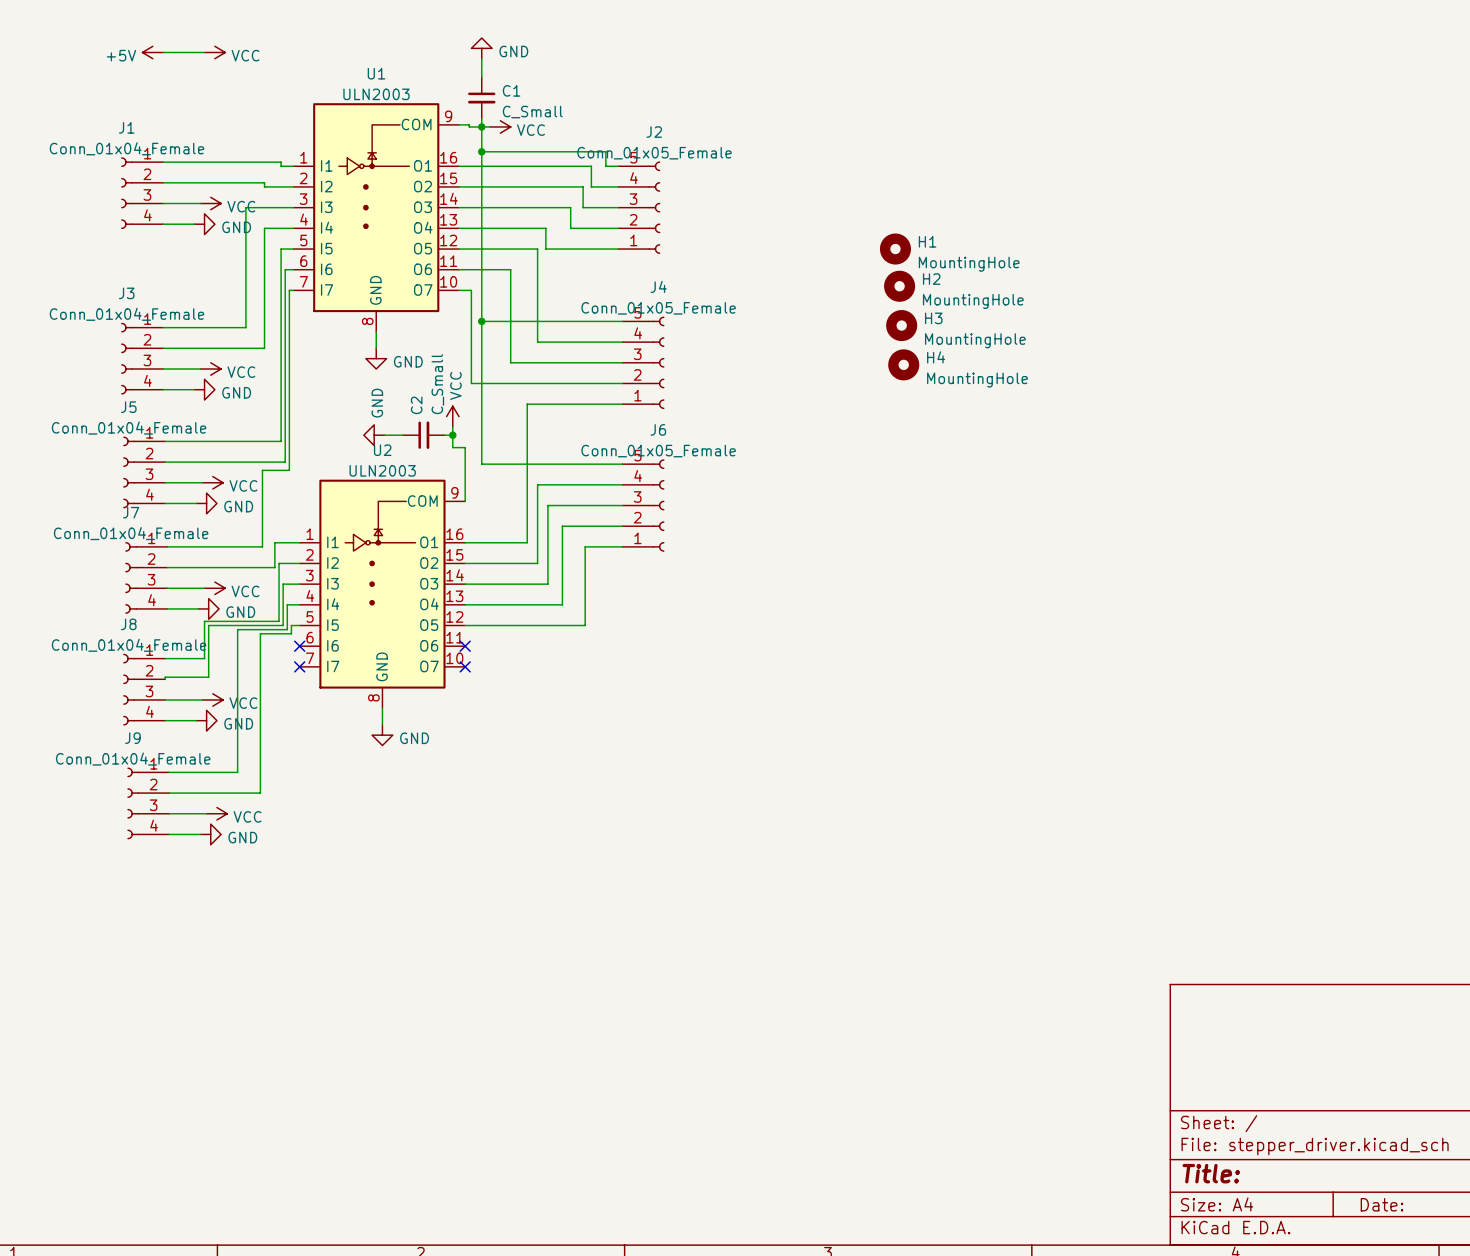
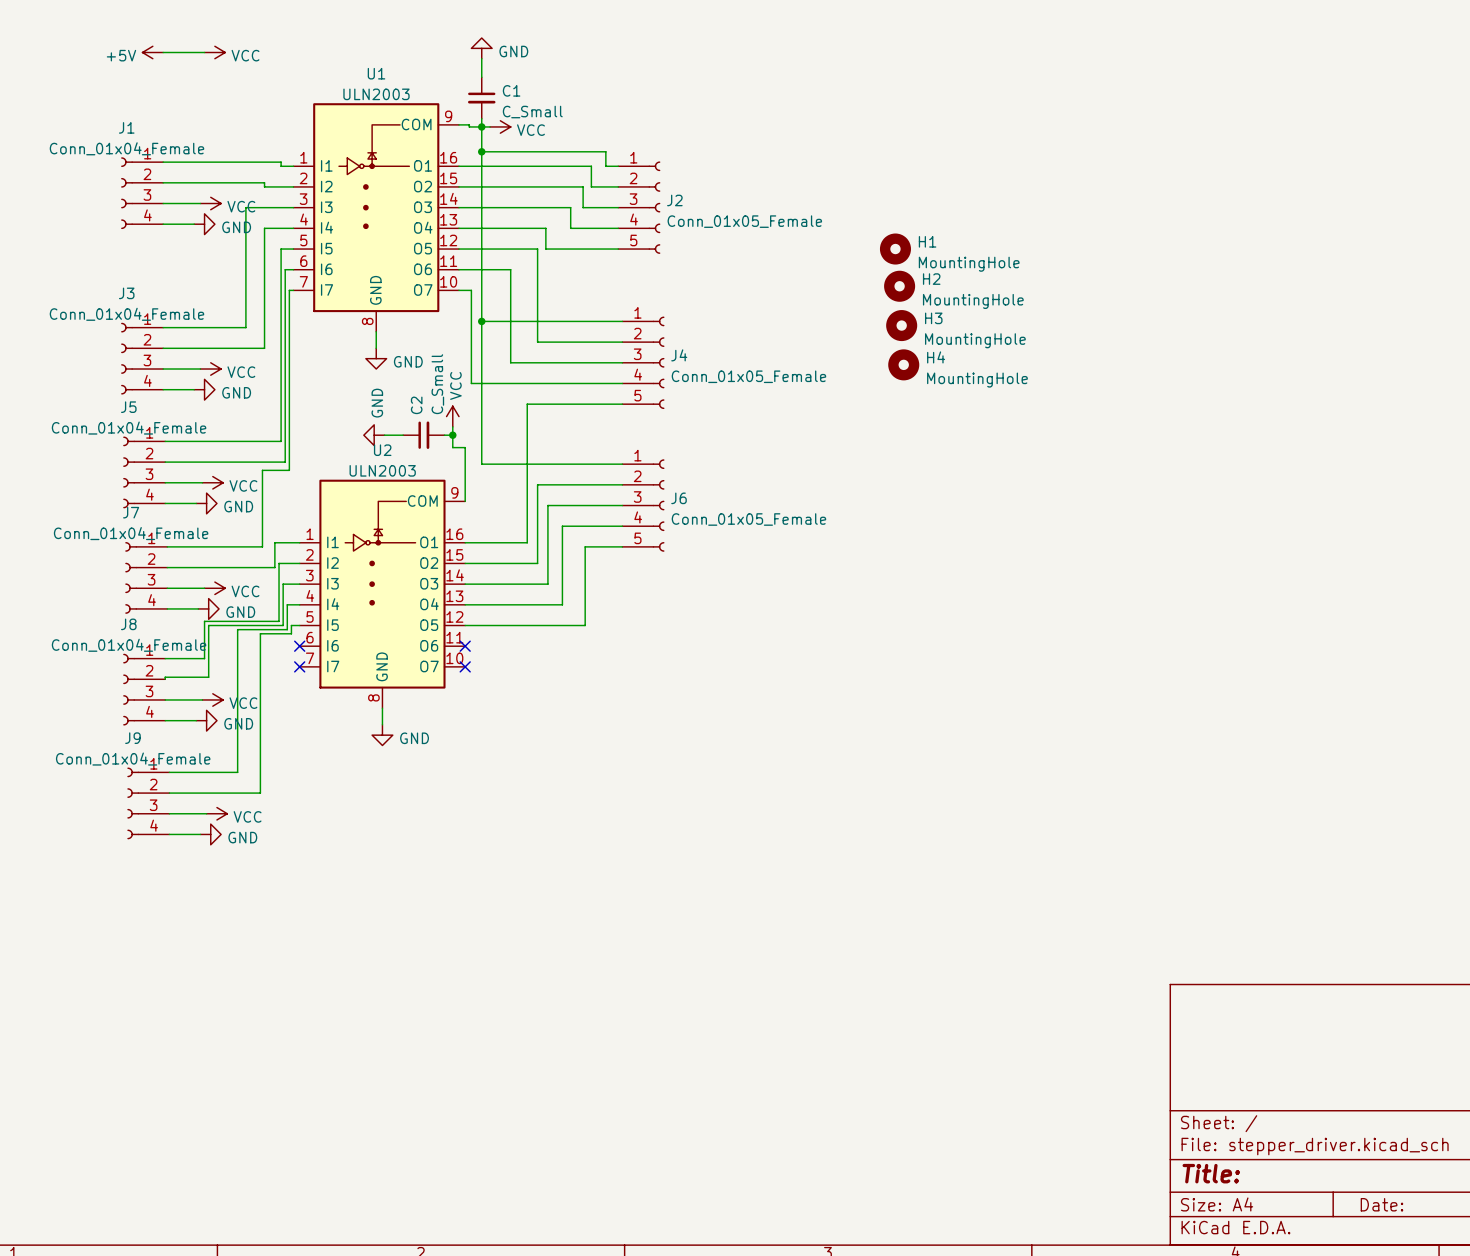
J2 name position: J2 (654, 132) -> J2 (674, 200)
J2 value position: Conn_01x05_Female (654, 153) -> Conn_01x05_Female (744, 221)
J2 flip: as is (654, 207) -> up-down (654, 207)
J4 name position: J4 (658, 286) -> J4 (679, 355)
J4 value position: Conn_01x05_Female (658, 308) -> Conn_01x05_Female (748, 376)
J4 flip: as is (658, 362) -> up-down (658, 362)
J6 name position: J6 (658, 429) -> J6 (679, 498)
J6 value position: Conn_01x05_Female (658, 451) -> Conn_01x05_Female (748, 519)
J6 flip: as is (658, 505) -> up-down (658, 505)

